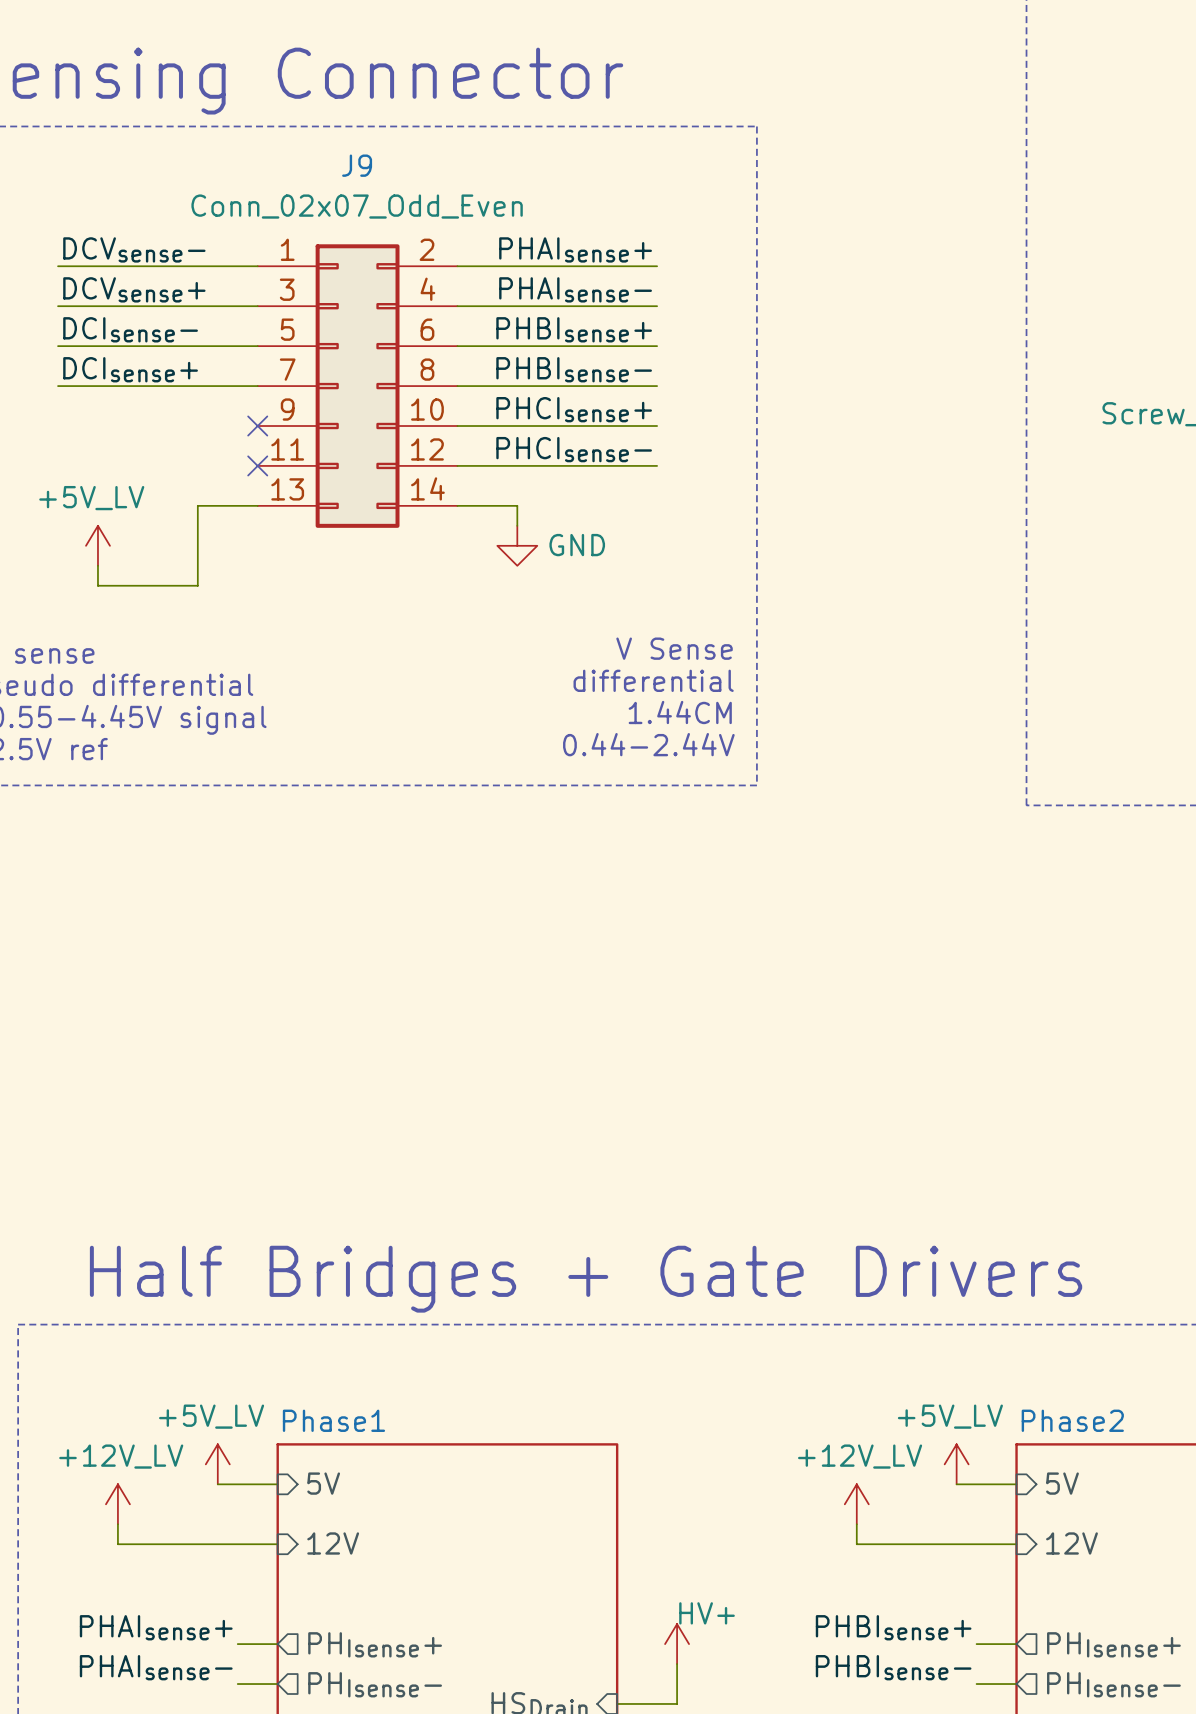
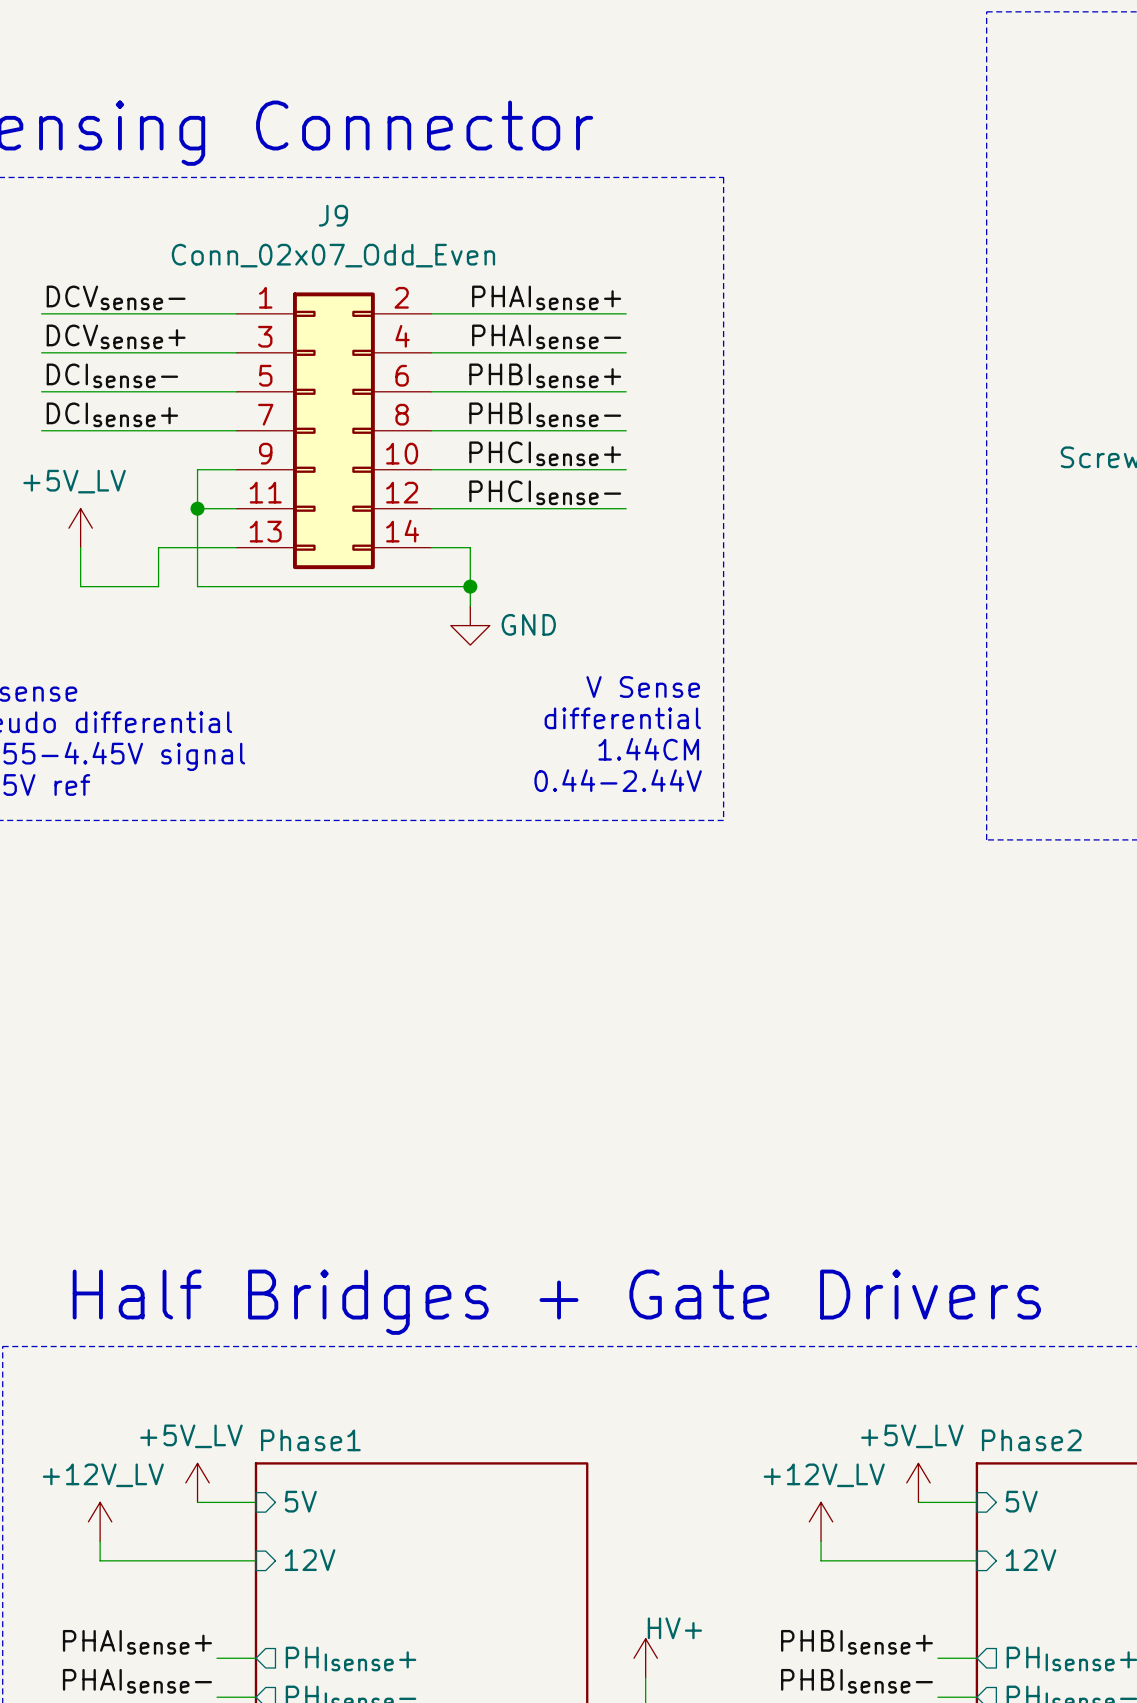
wire: none -> (236, 469) (197, 469) (197, 586) (470, 586)
no-connect mark: (257, 426) -> none
wire: none -> (197, 508) (236, 508)
junction: none -> (197, 508)
no-connect mark: (257, 465) -> none
wire: (197, 505) (197, 585) (97, 585) (97, 565) -> (178, 547) (158, 547) (158, 586) (80, 586) (80, 547)
wire: (497, 505) (517, 505) (517, 525) -> (470, 547) (470, 606)
power symbol position: +5V_LV (97, 545) -> +5V_LV (80, 528)
junction: none -> (470, 586)
power symbol position: GND (517, 545) -> GND (470, 625)

